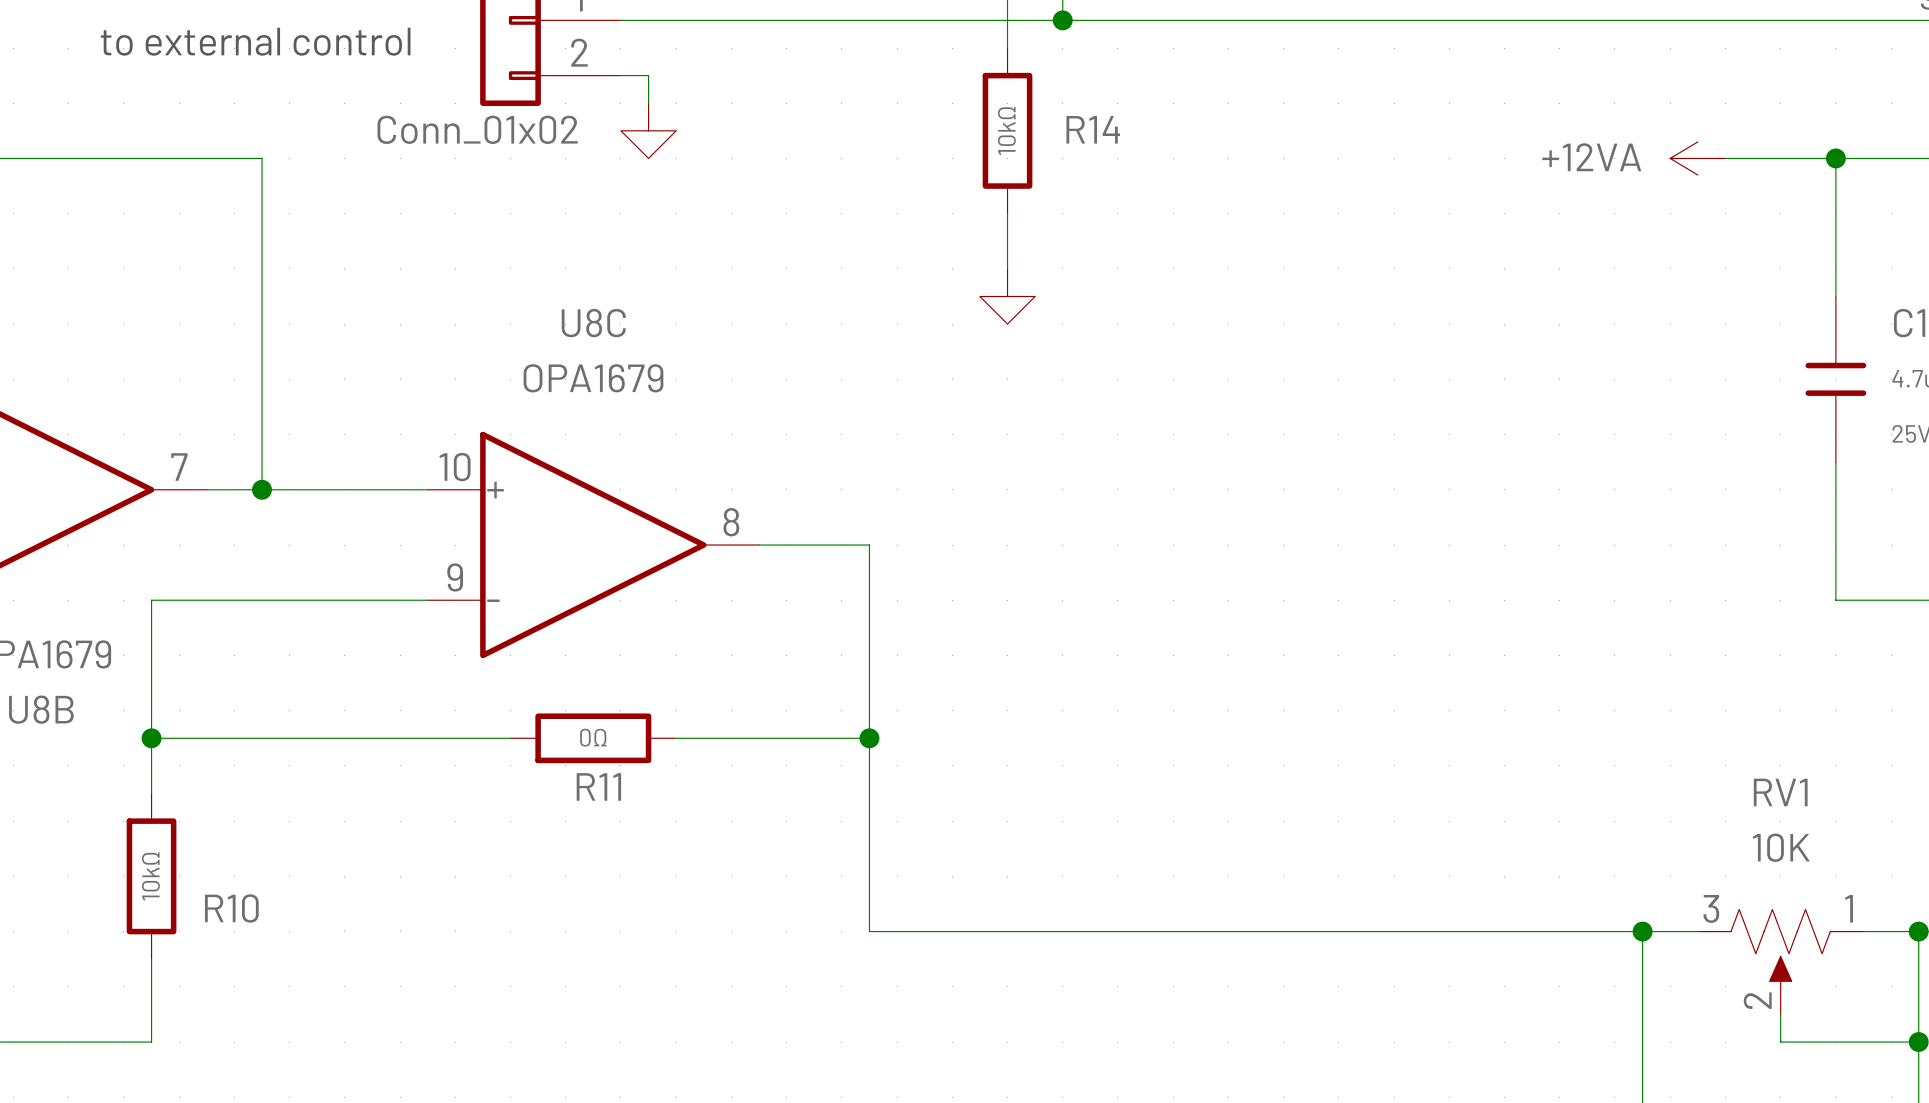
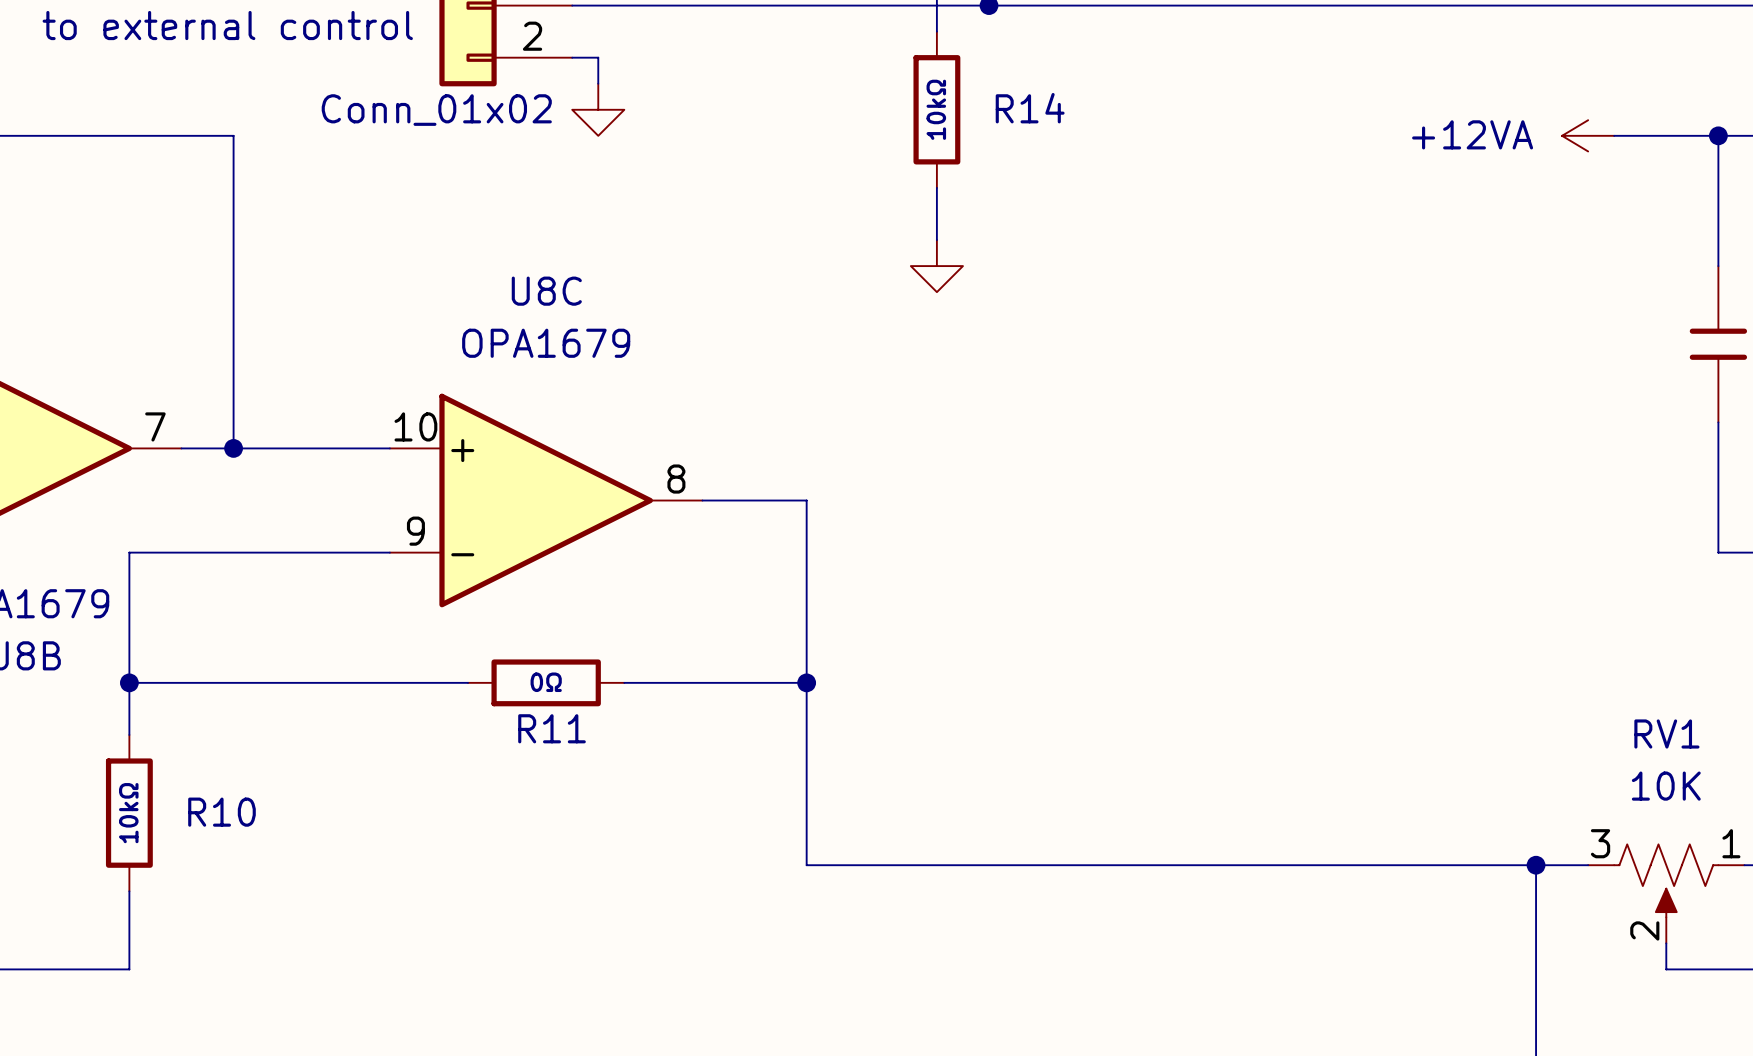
R10 name position: R10 (231, 908) -> R10 (221, 812)

